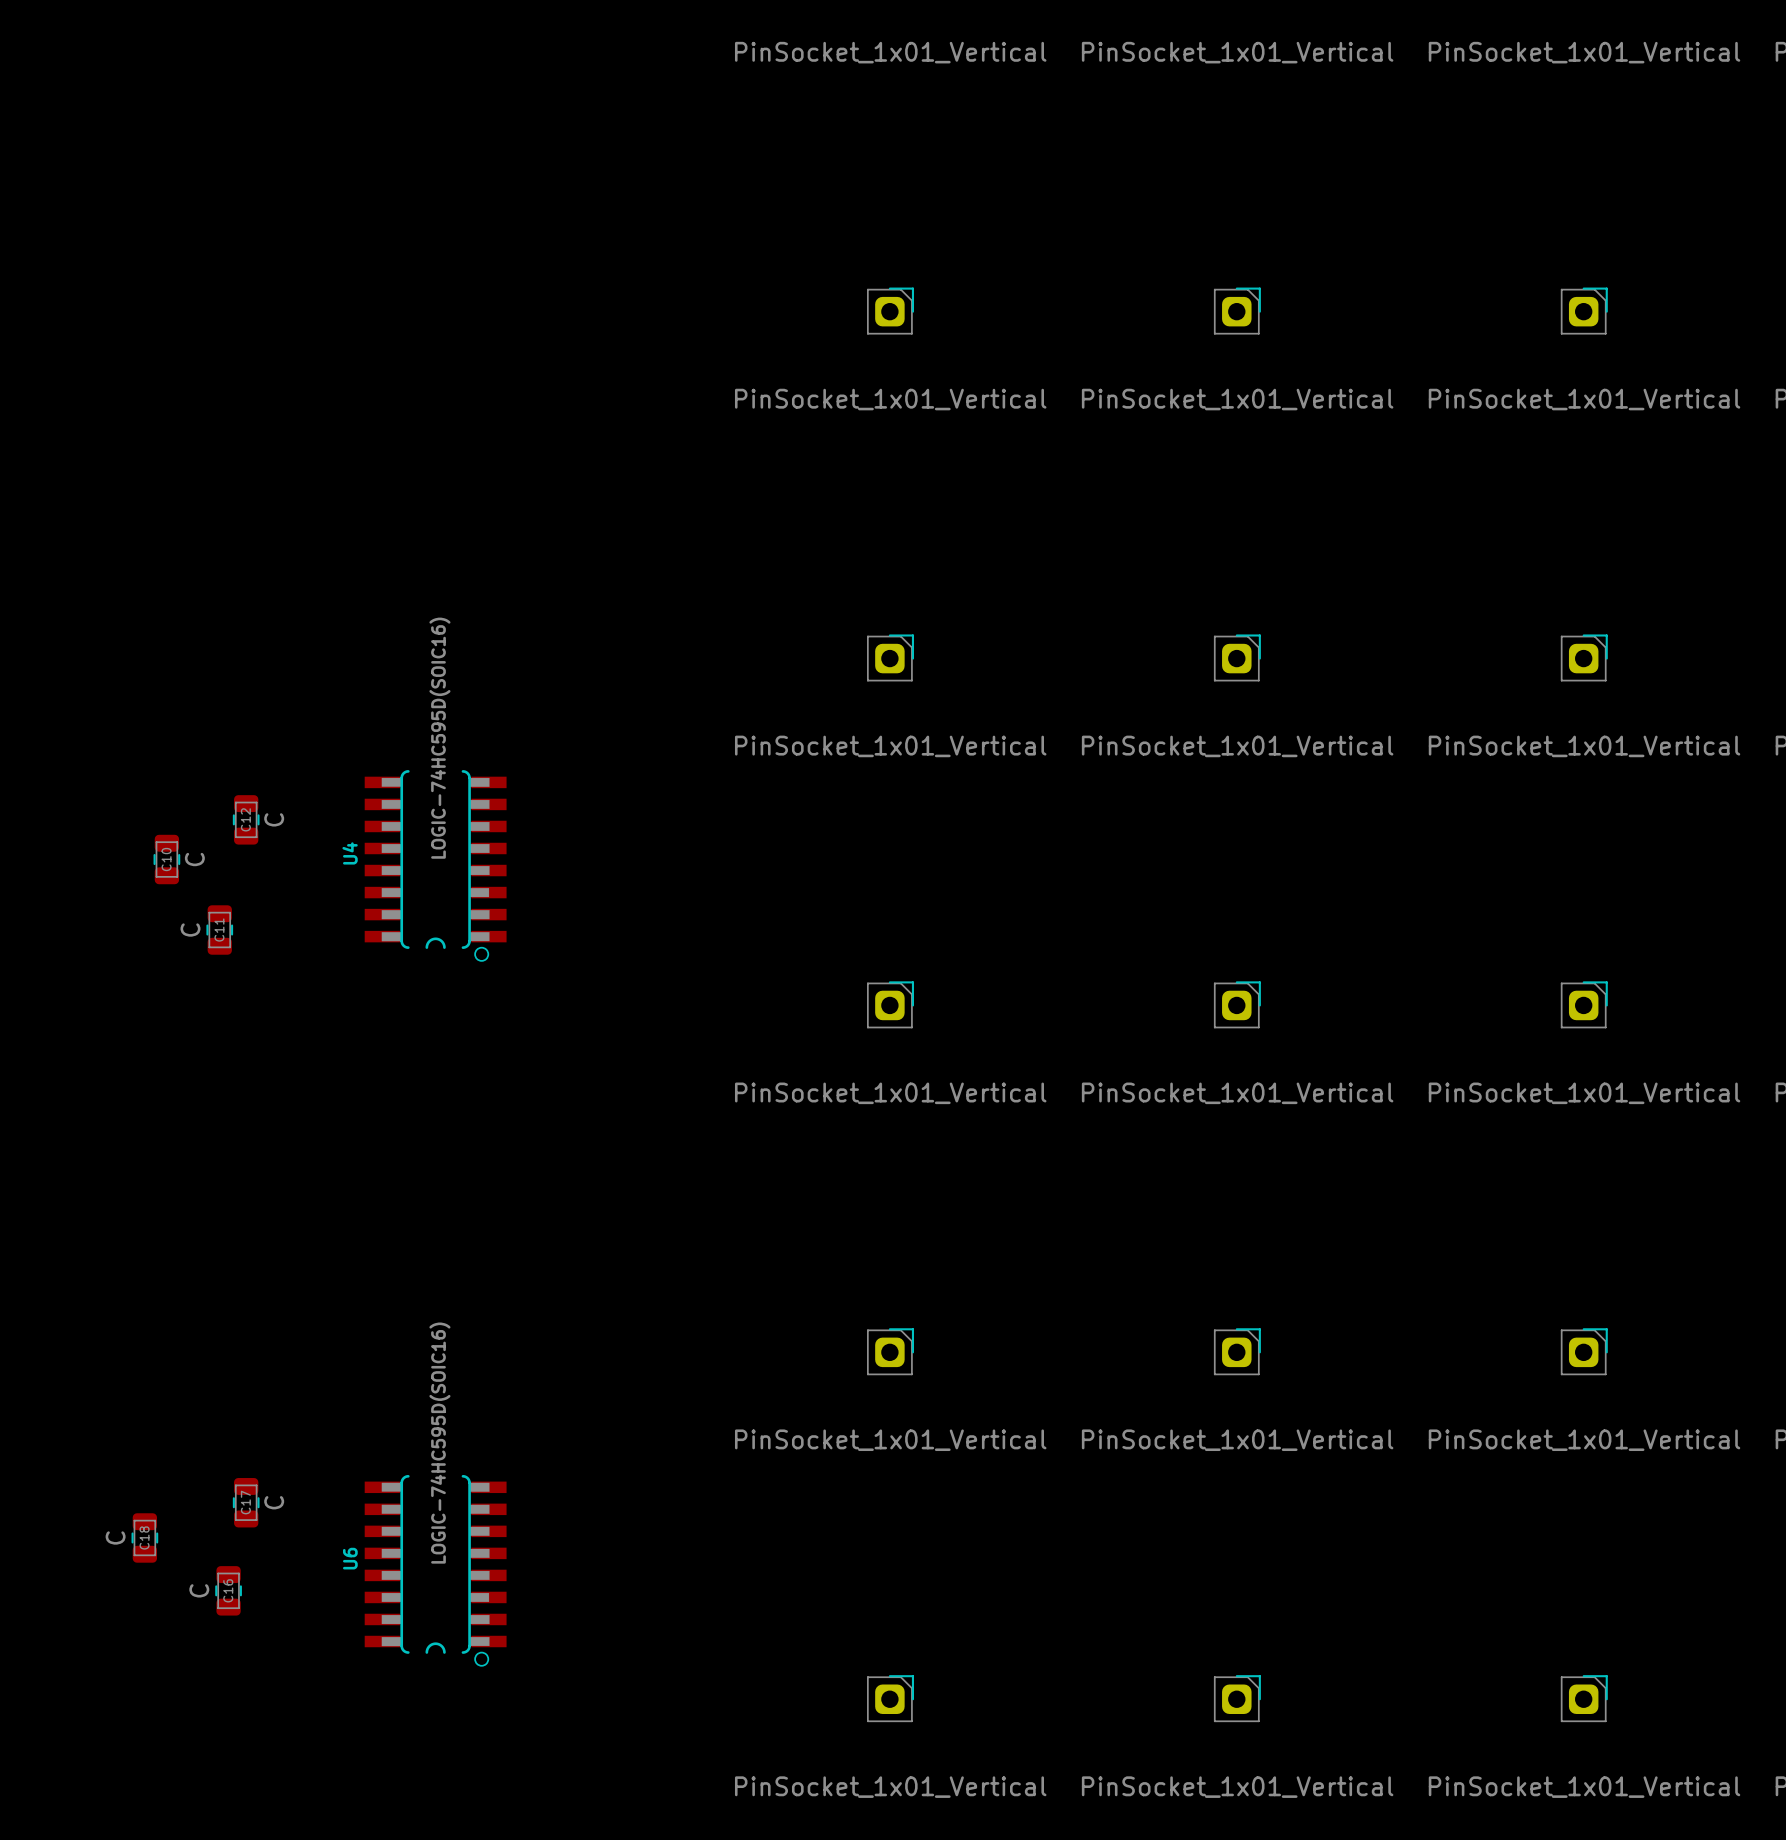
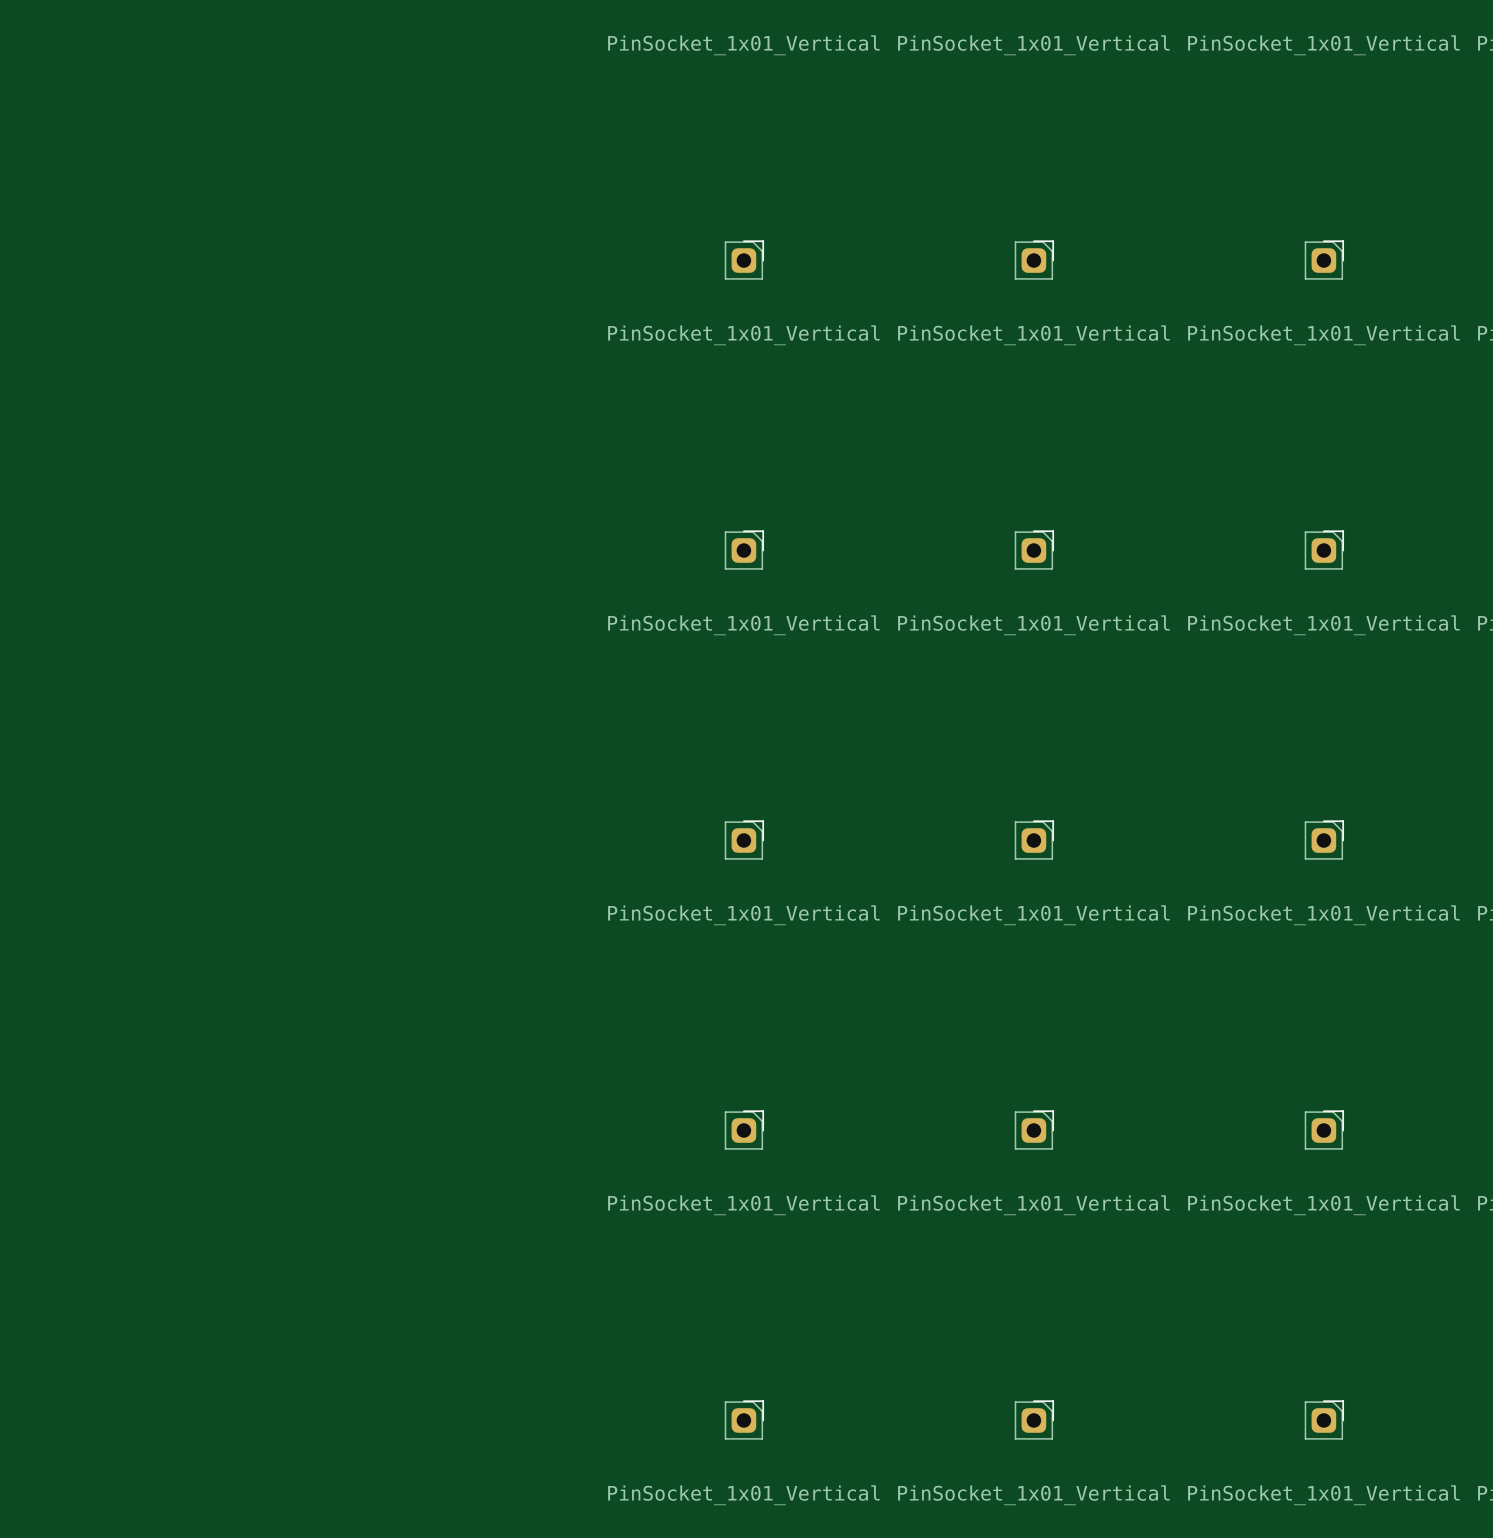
C12: C (246, 819) -> none
C10: C (166, 859) -> none
U4: LOGIC-74HC595D(SOIC16) (435, 865) -> none
C11: C (219, 930) -> none
C17: C (246, 1502) -> none
C18: C (144, 1537) -> none
U6: LOGIC-74HC595D(SOIC16) (435, 1570) -> none
C16: C (228, 1590) -> none

